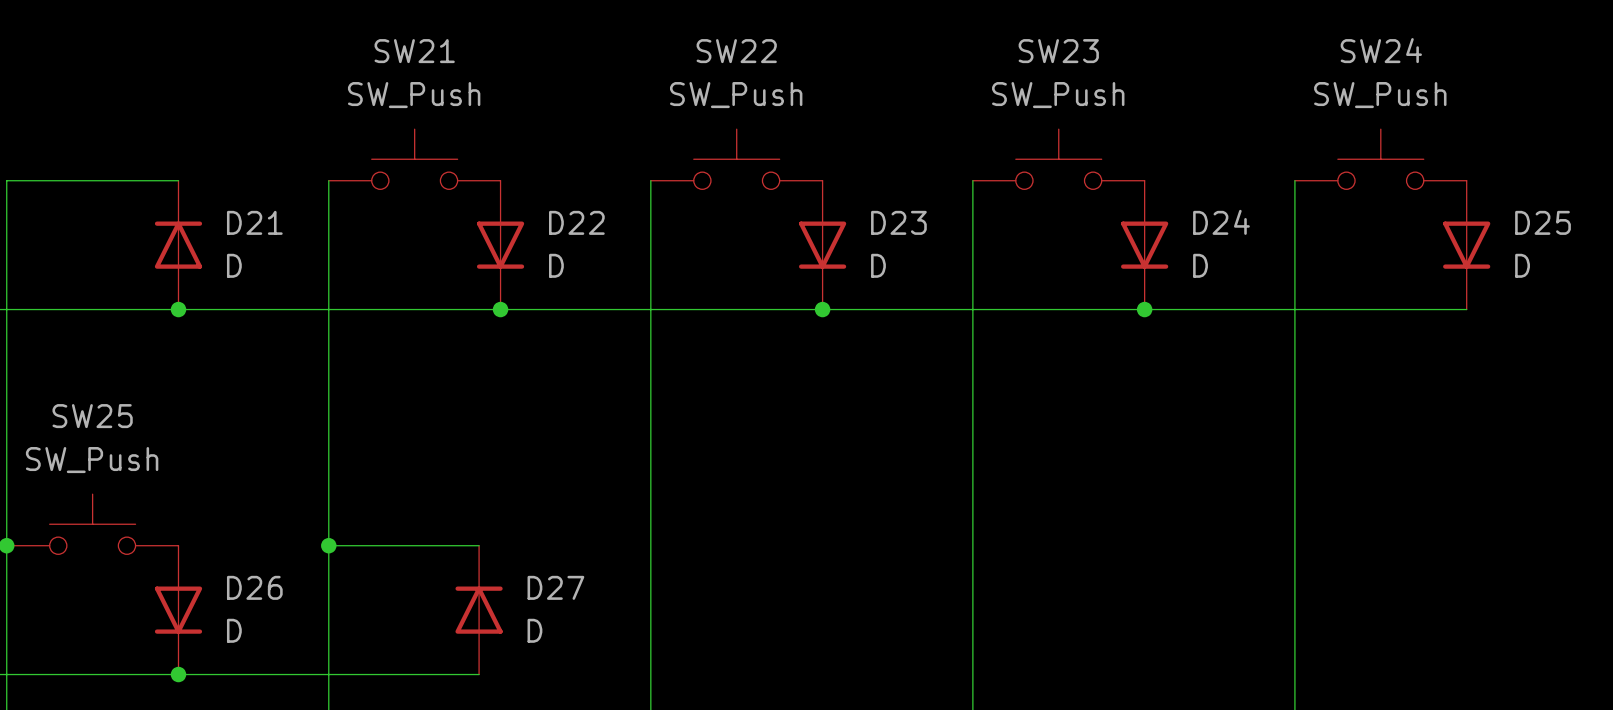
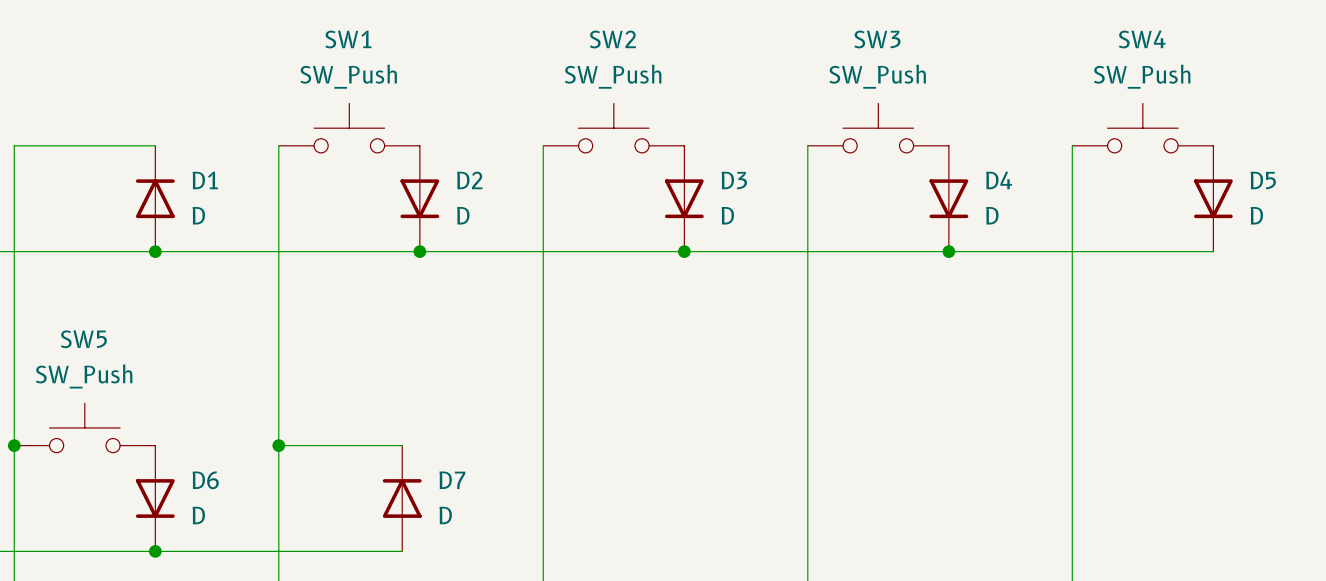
SW24 name: SW24 (1381, 50) -> SW4 (1142, 39)
SW21 name: SW21 (414, 51) -> SW1 (348, 39)
SW22 name: SW22 (736, 51) -> SW2 (612, 39)
SW23 name: SW23 (1058, 51) -> SW3 (877, 39)
D21 name: D21 (254, 222) -> D1 (205, 180)
D22 name: D22 (576, 222) -> D2 (469, 180)
D23 name: D23 (898, 222) -> D3 (734, 180)
D24 name: D24 (1221, 222) -> D4 (999, 180)
D25 name: D25 (1543, 222) -> D5 (1263, 180)
SW25 name: SW25 (92, 416) -> SW5 (83, 339)
D26 name: D26 (254, 587) -> D6 (205, 480)
D27 name: D27 (555, 587) -> D7 (452, 480)

